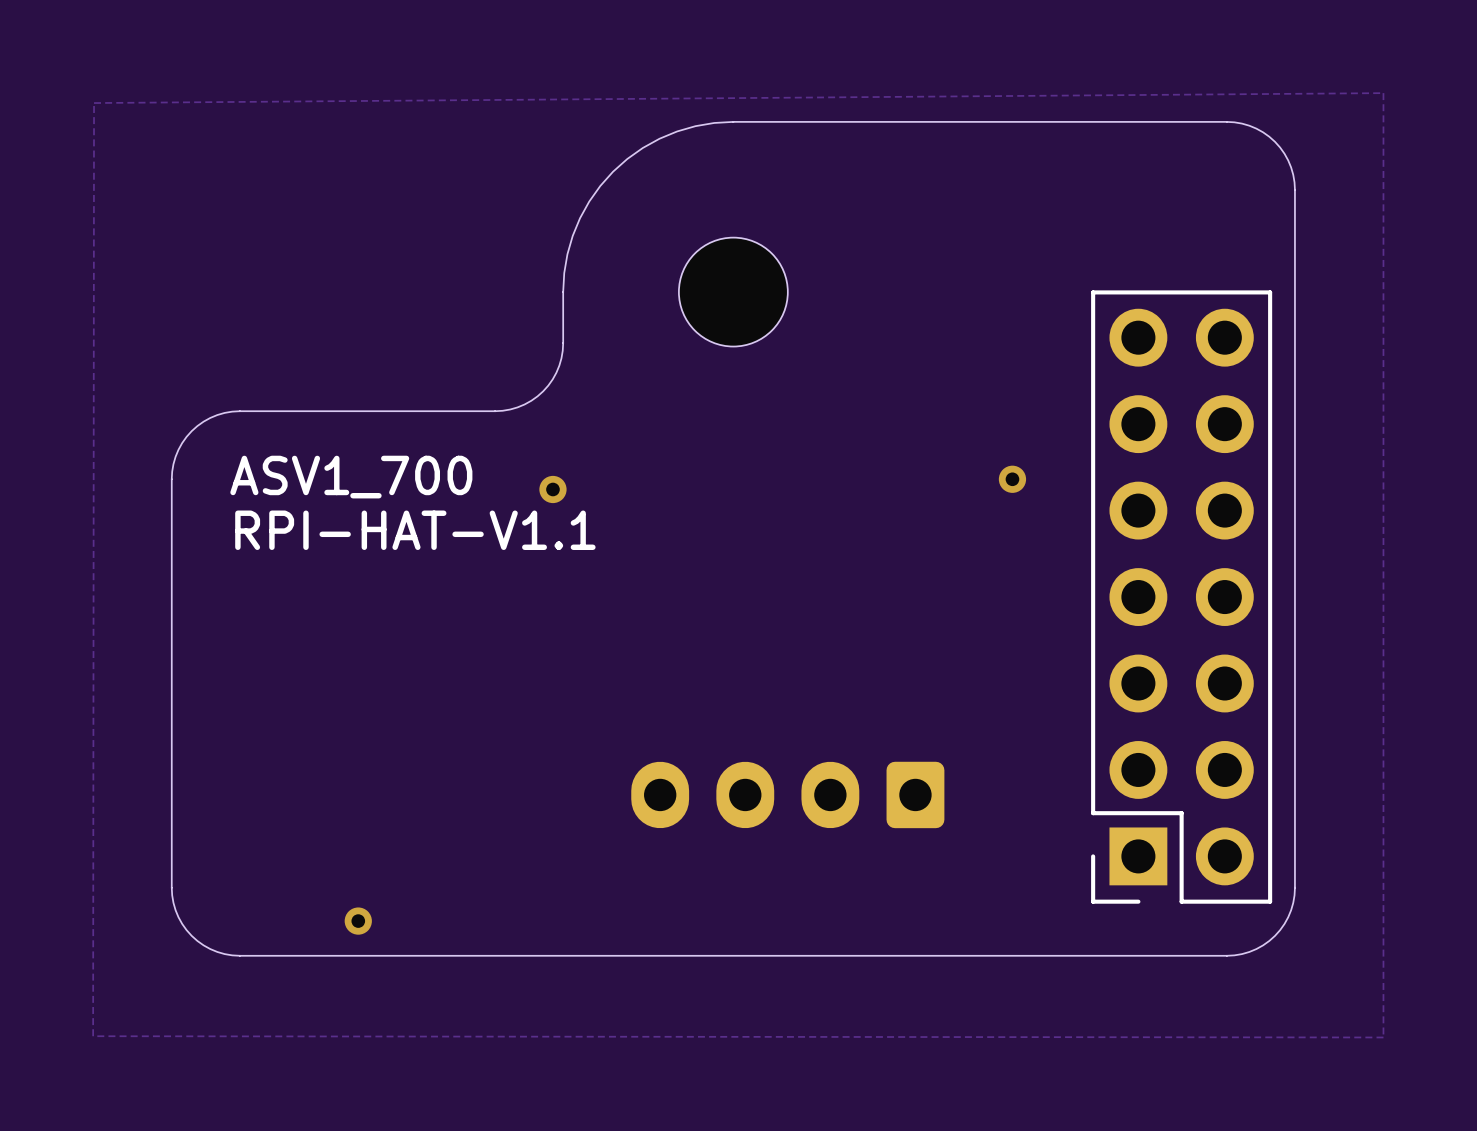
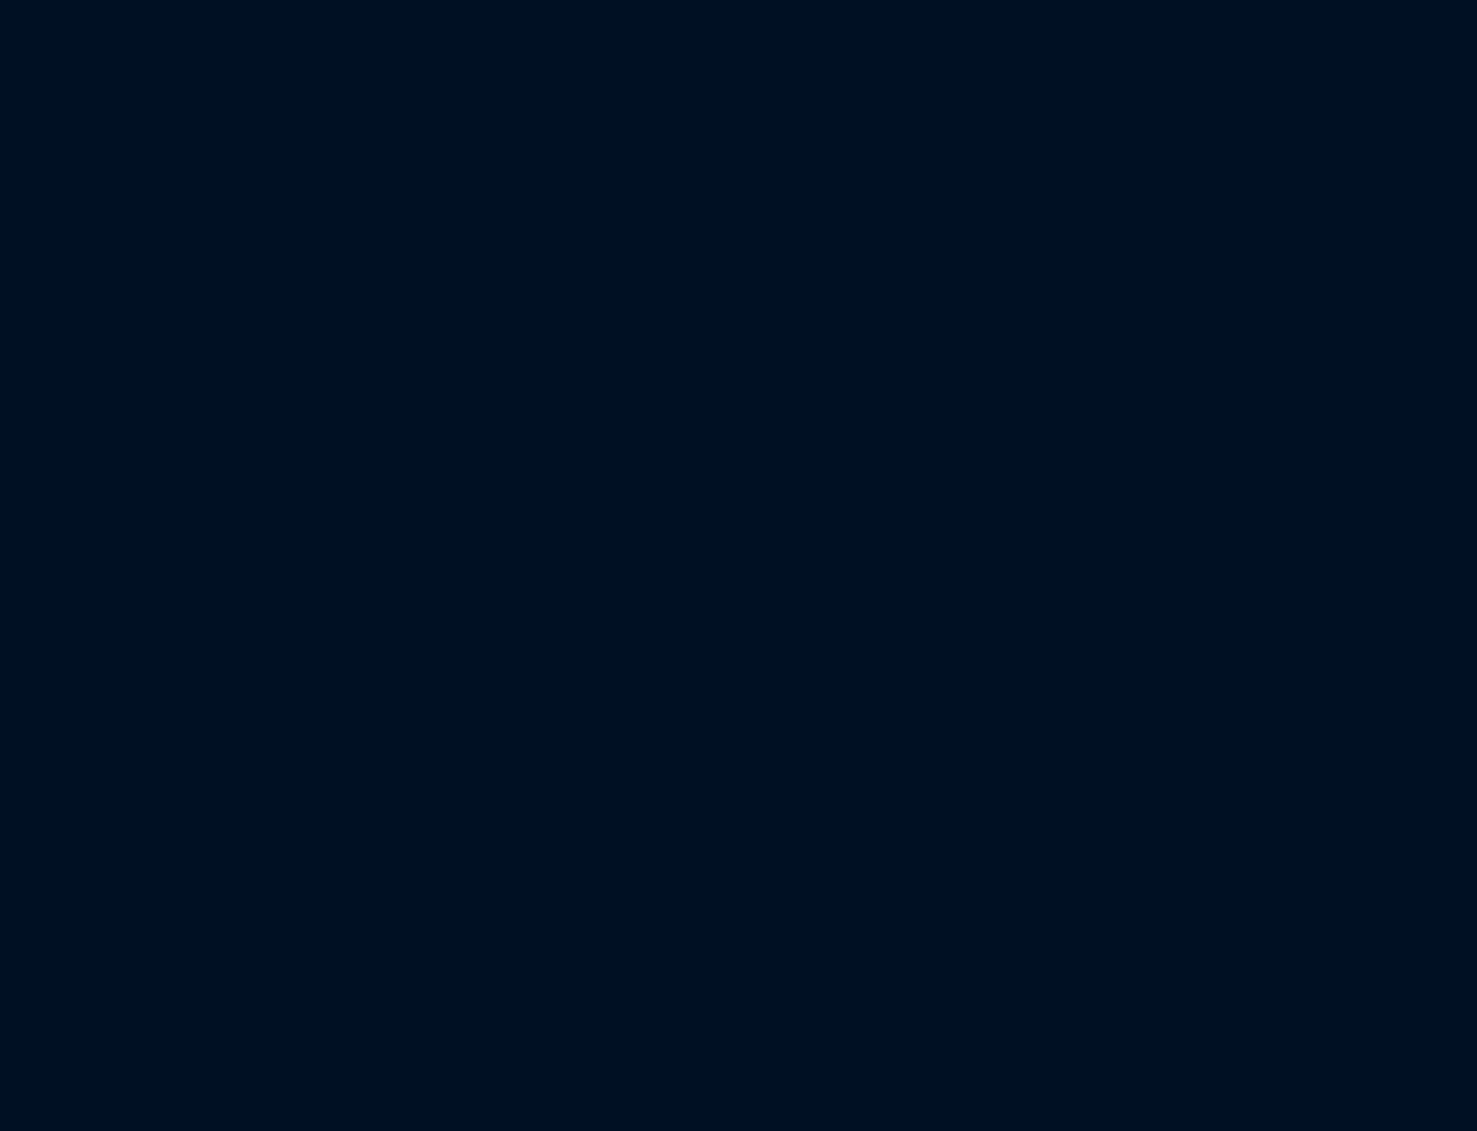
zone outline: (1383, 93) (1383, 1037) (93, 1036) (94, 103) (1383, 93) -> none
board edge: (1226, 121) (733, 121) (695, 126) (677, 131) (659, 138) (627, 159) (600, 185) (580, 218) (572, 235) (564, 273) (561, 358) (556, 372) (548, 385) (531, 400) (510, 409) (495, 411) (232, 411) (210, 417) (197, 426) (186, 436) (178, 449) (173, 464) (171, 479) (171, 887) (175, 910) (186, 930) (197, 940) (210, 949) (224, 954) (239, 955) (1226, 955) (1249, 951) (1269, 940) (1280, 930) (1288, 917) (1293, 902) (1294, 887) (1294, 189) (1293, 174) (1288, 160) (1275, 141) (1263, 132) (1249, 125) (1226, 121) -> none
part: (733, 292) -> none
text: ASV1_700 (351, 477) -> none
via: (1012, 479) -> none
via: (552, 489) -> none
text: RPI-HAT-V1.1 (415, 530) -> none
part: (1181, 597) -> none
part: (787, 794) -> none
via: (358, 921) -> none

